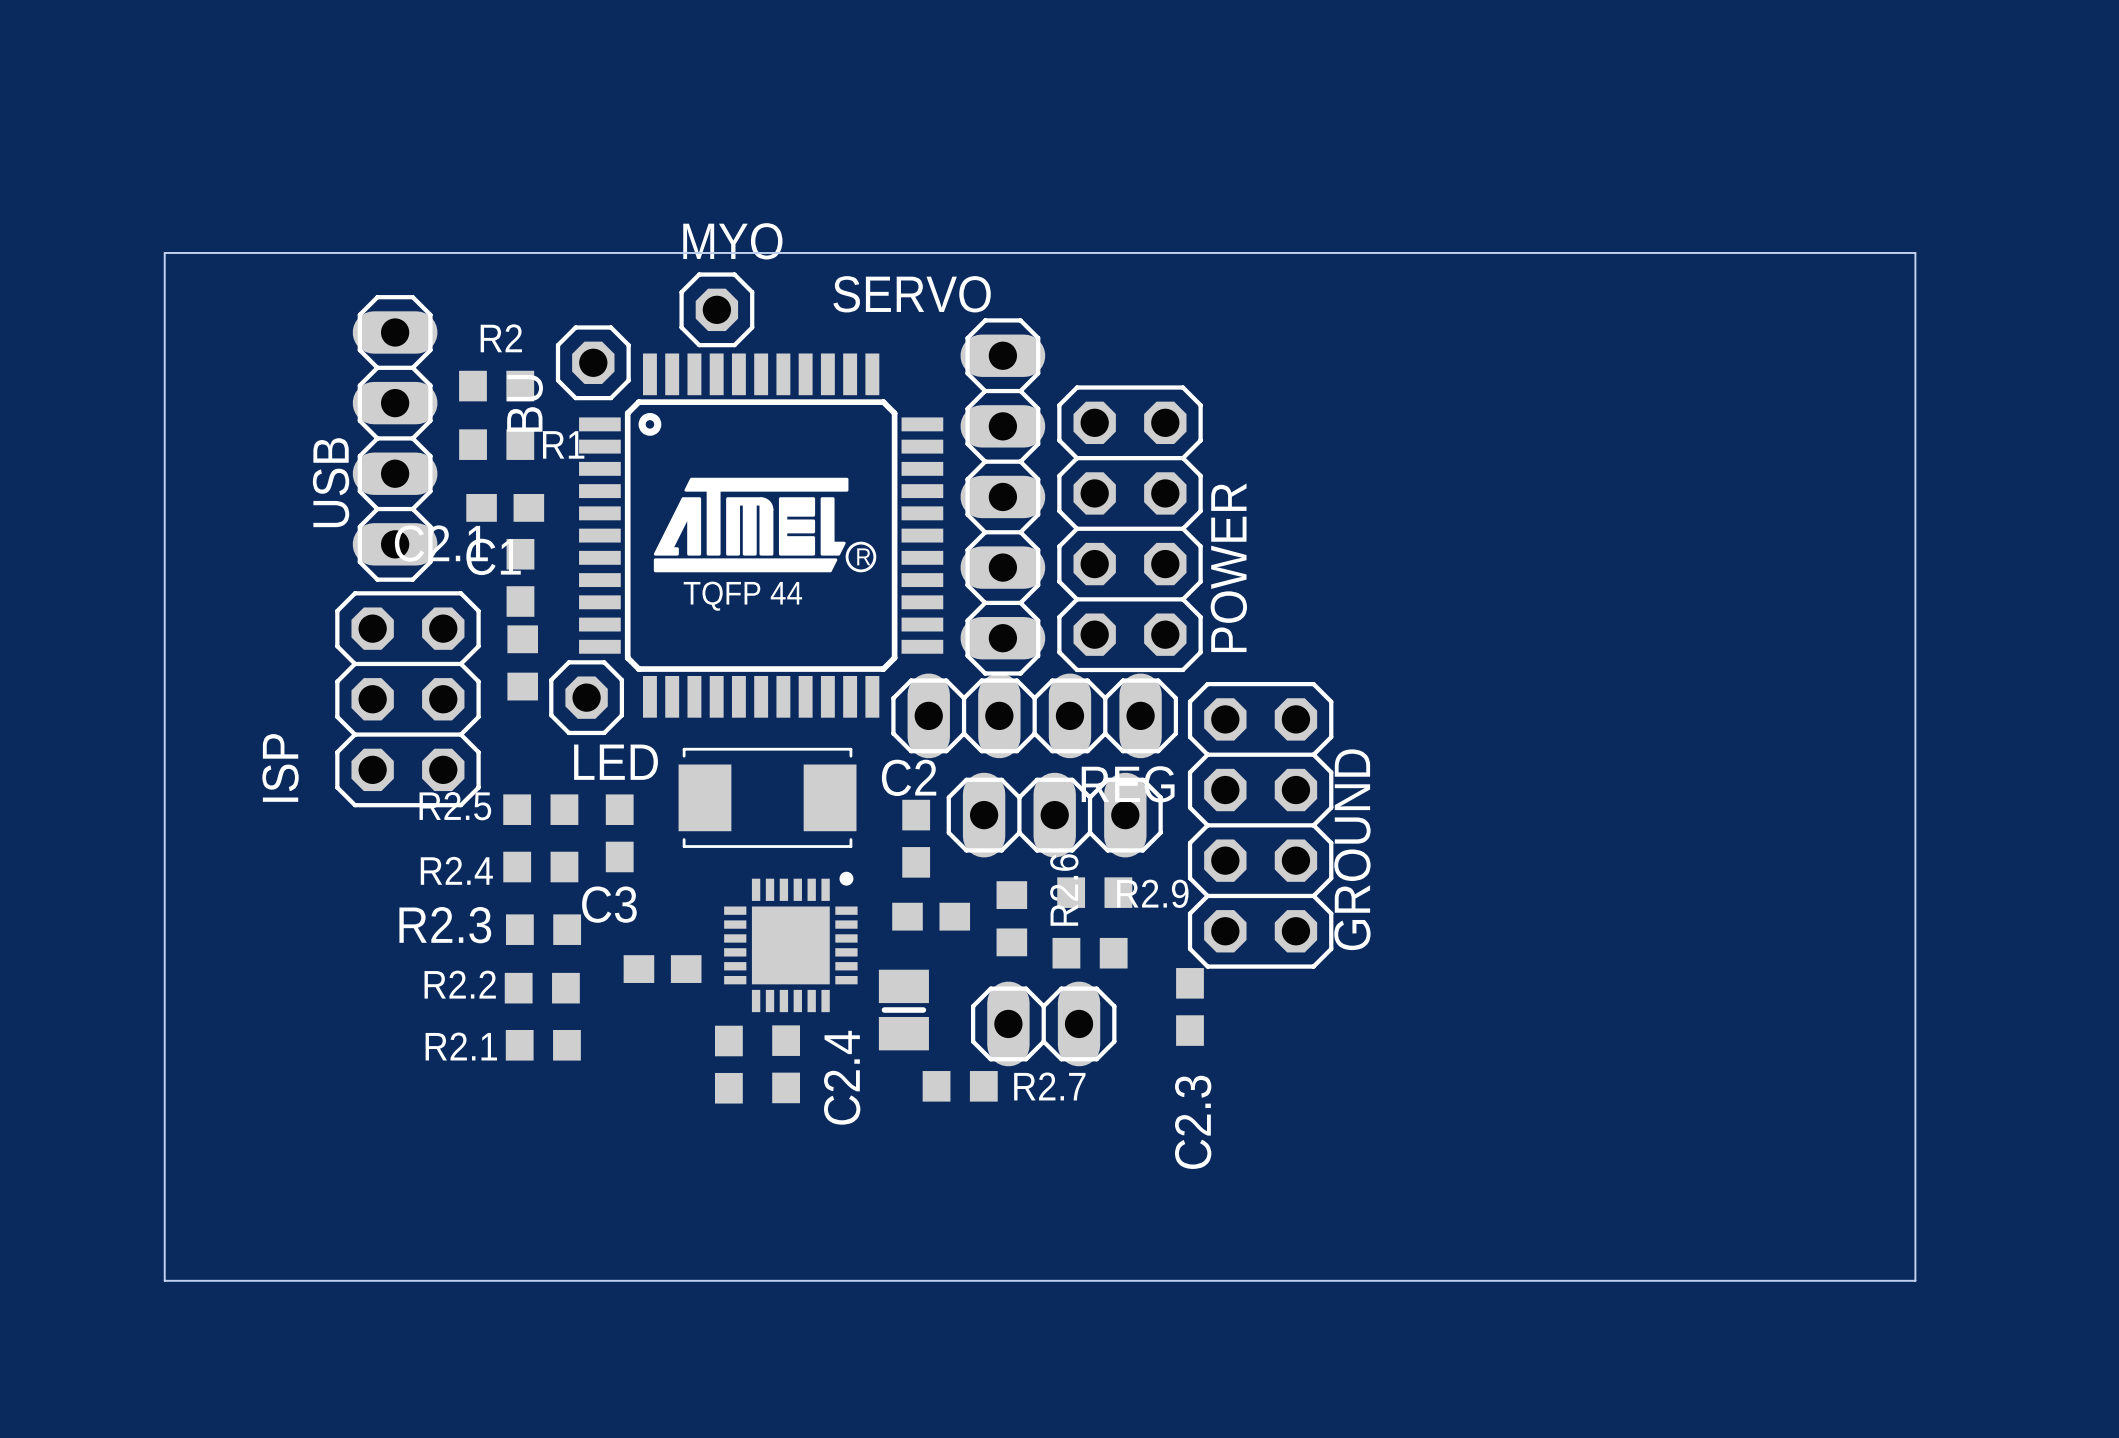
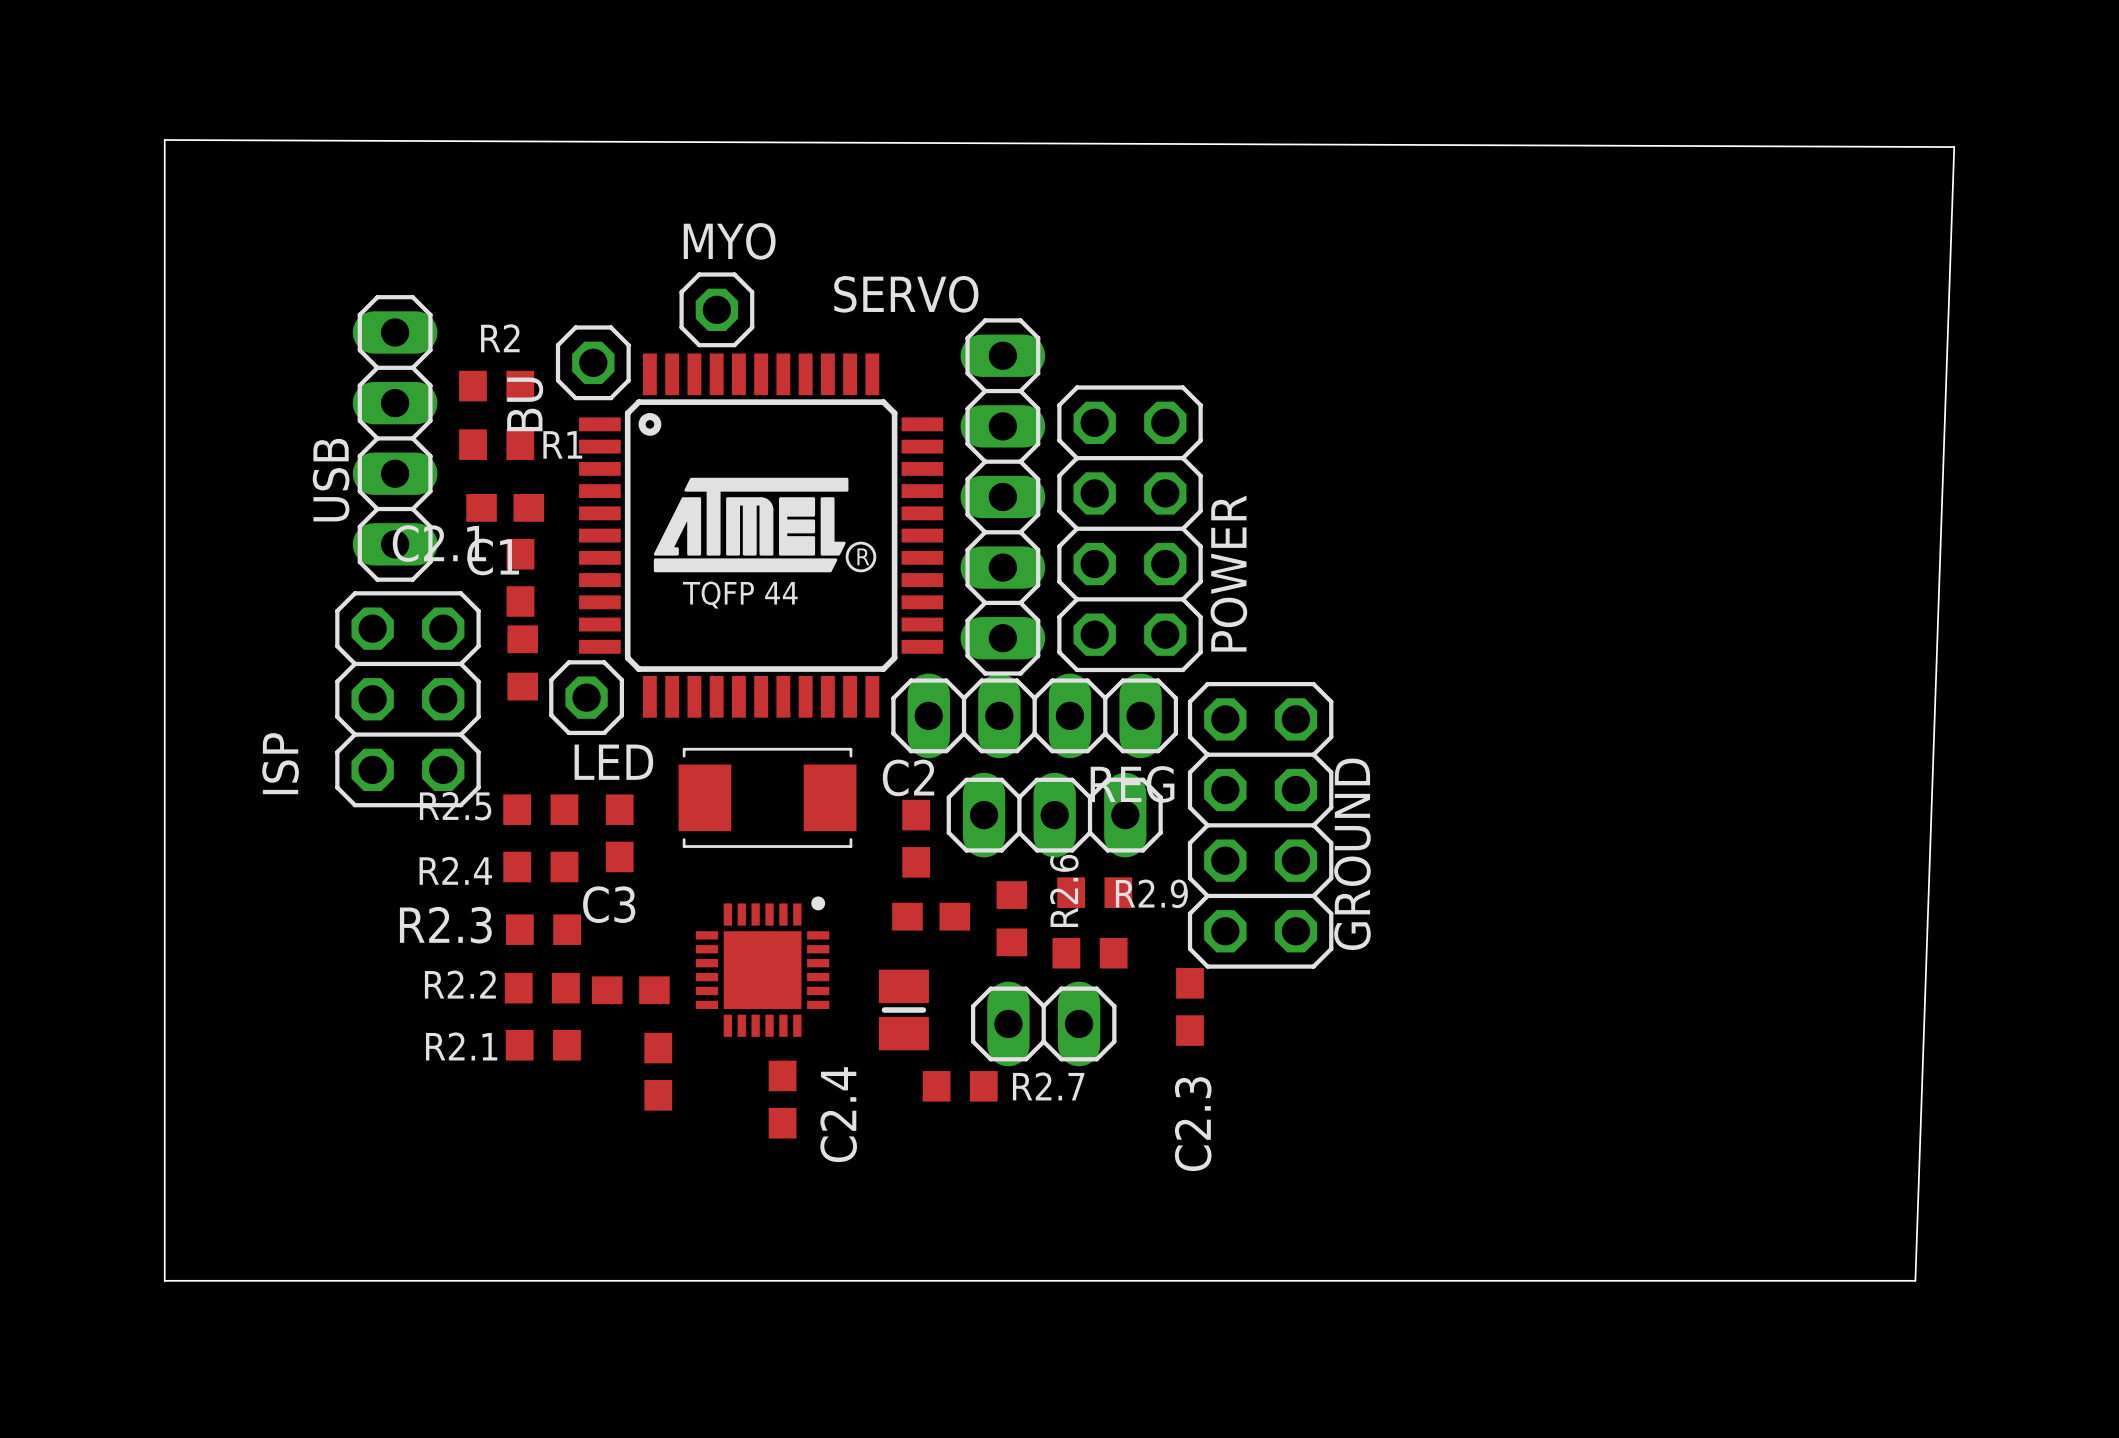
board edge: (164, 252) (1915, 252) (1915, 1280) -> (164, 252) (164, 140) (1954, 147) (1915, 1280)
part position: (790, 941) -> (762, 966)
part position: (662, 969) -> (630, 990)
part: (728, 1064) -> none
C2.4 position: (786, 1064) -> (782, 1099)
part: none -> (658, 1071)

